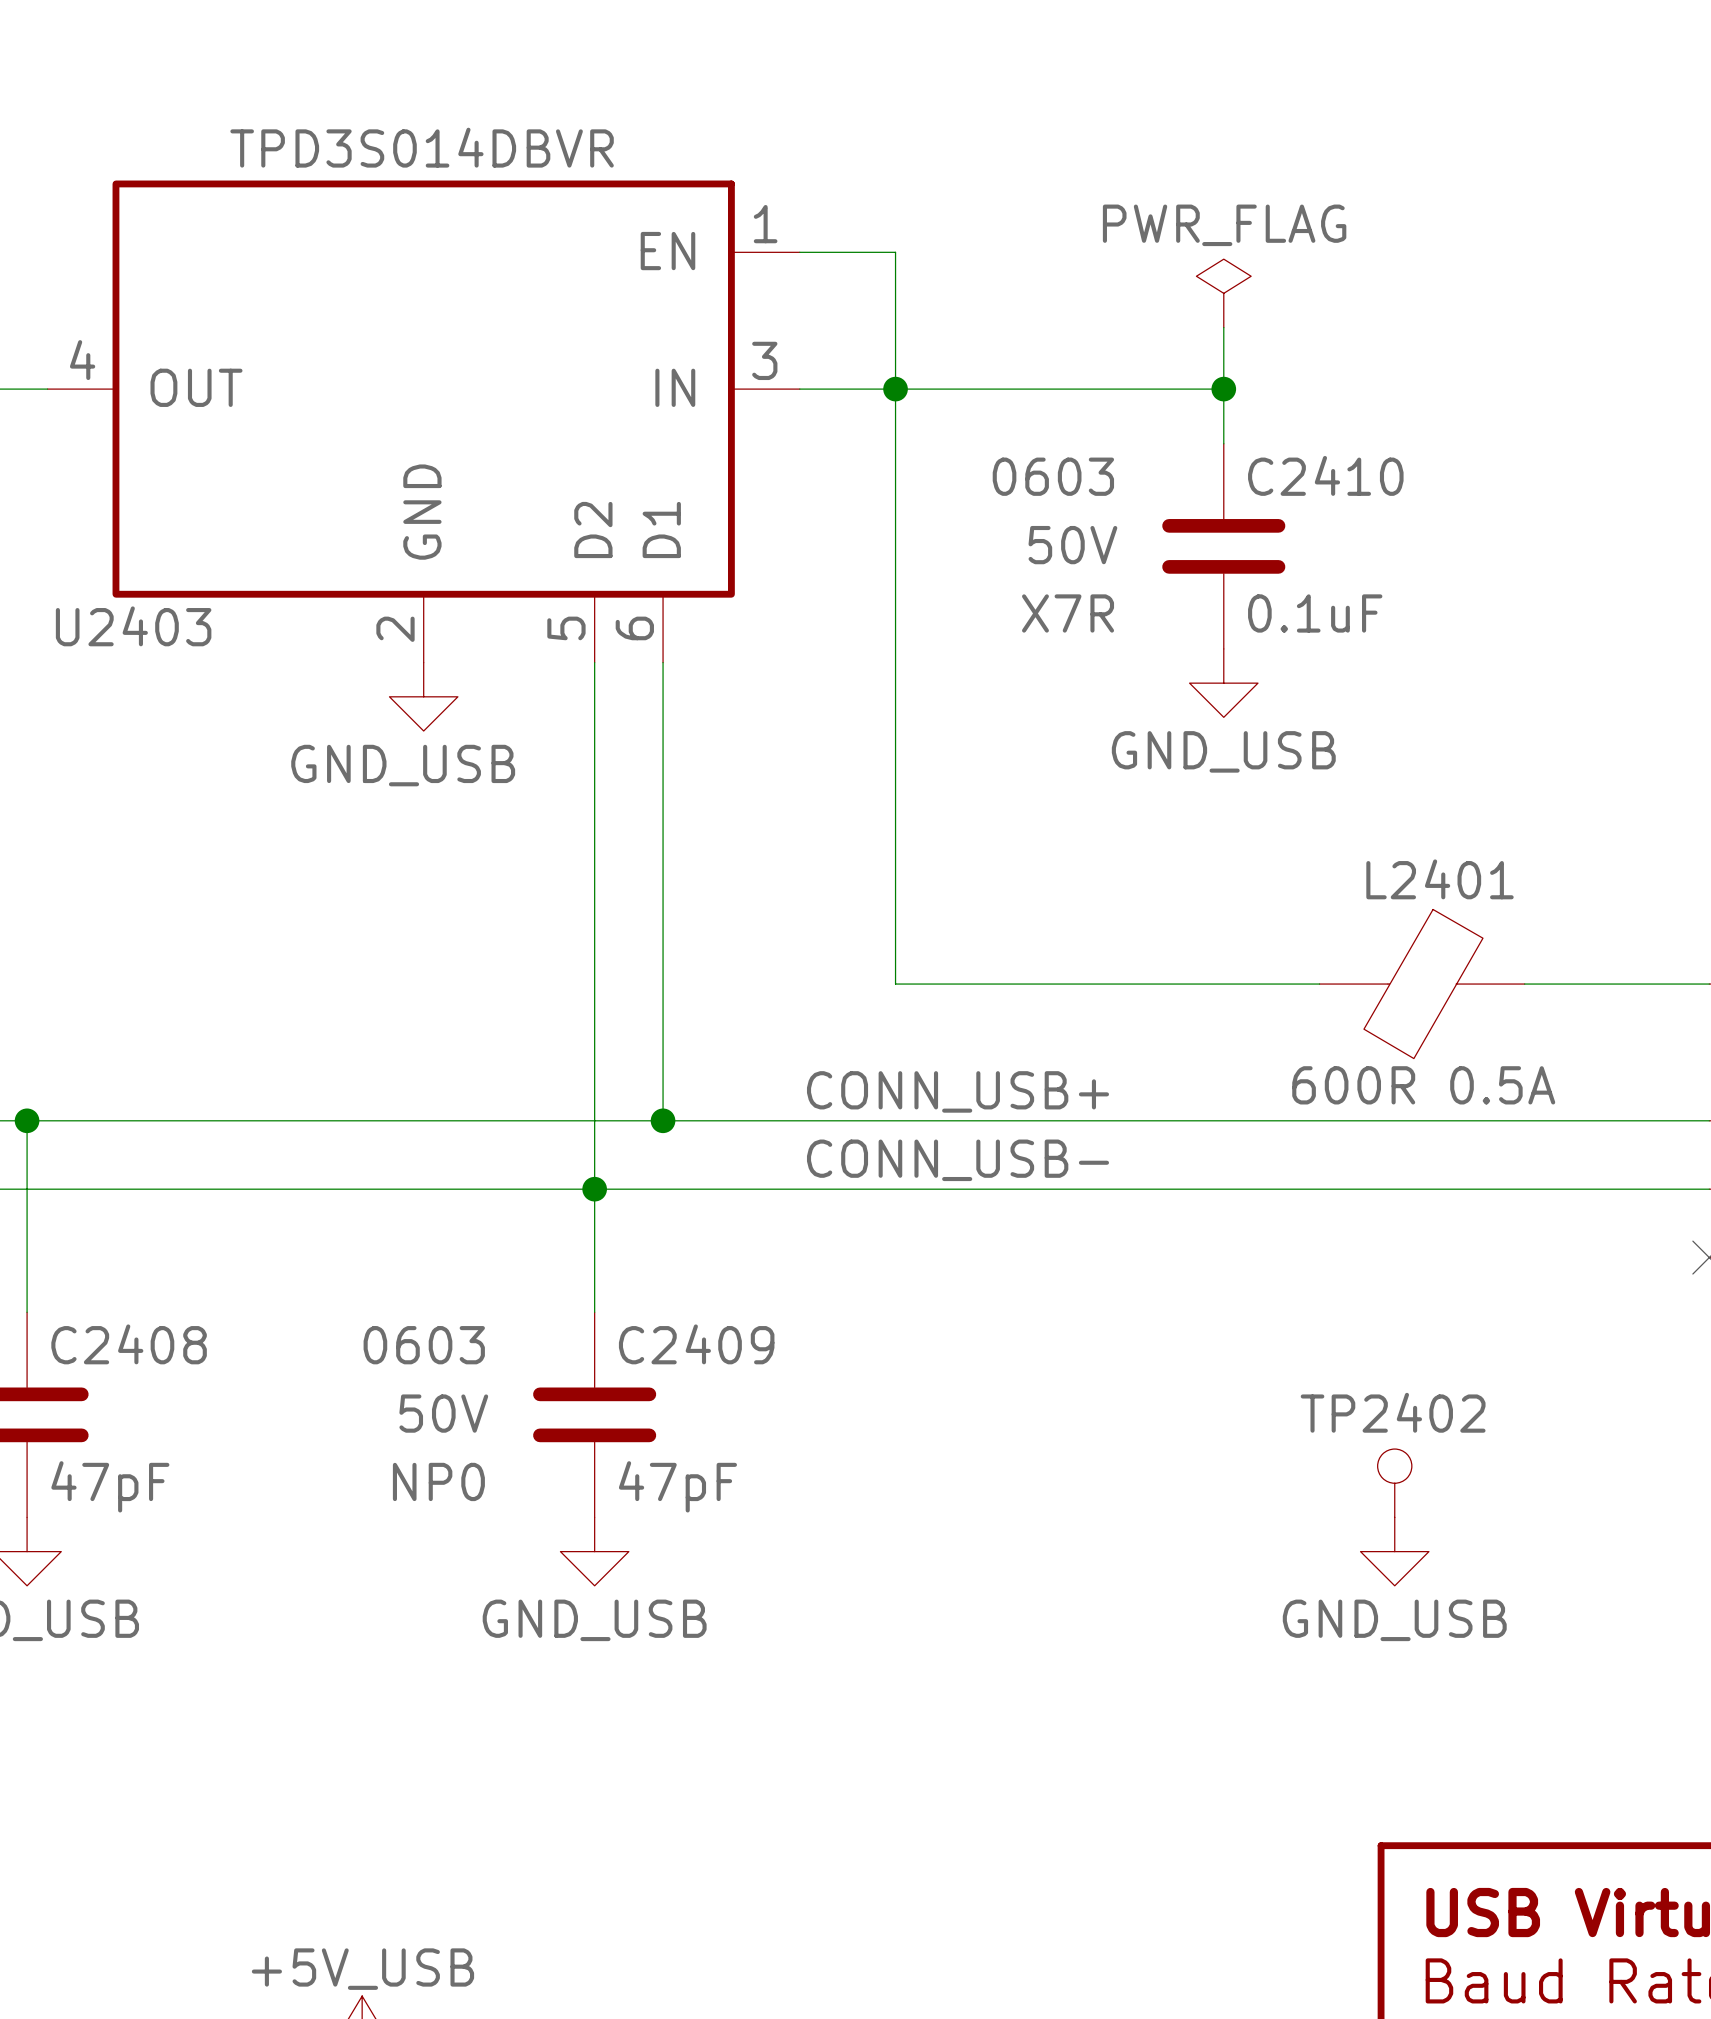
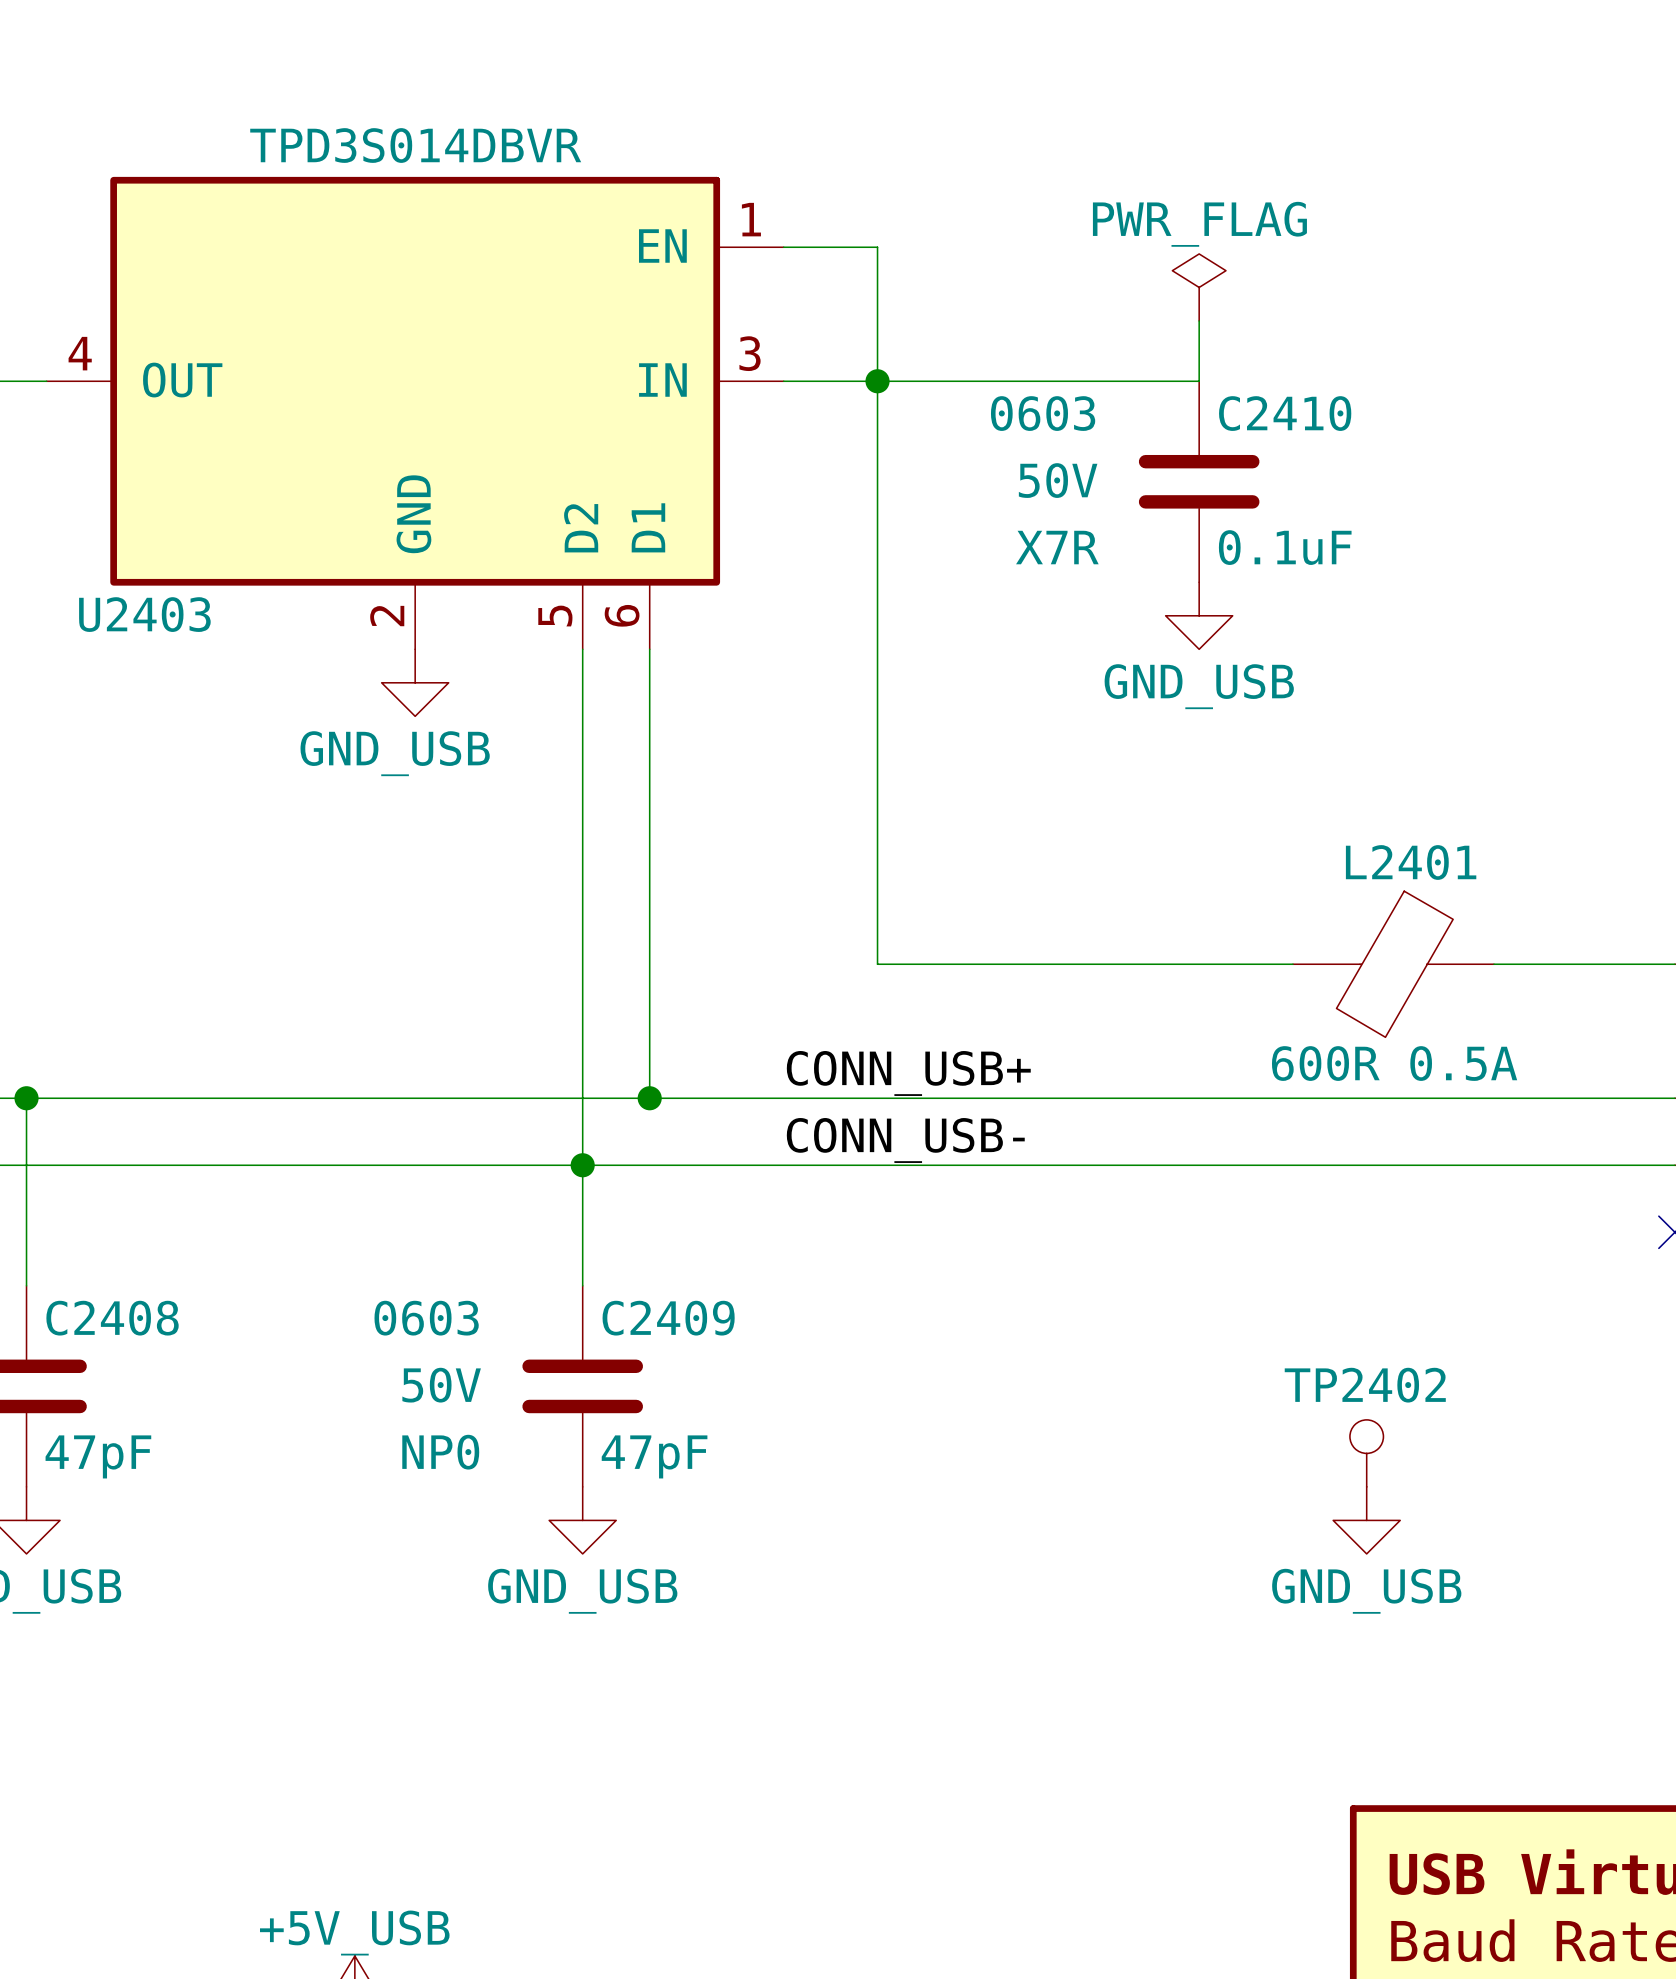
junction: (1223, 389) -> none
C2410 position: (1223, 546) -> (1199, 481)
power symbol position: GND_USB (1223, 683) -> GND_USB (1199, 615)

